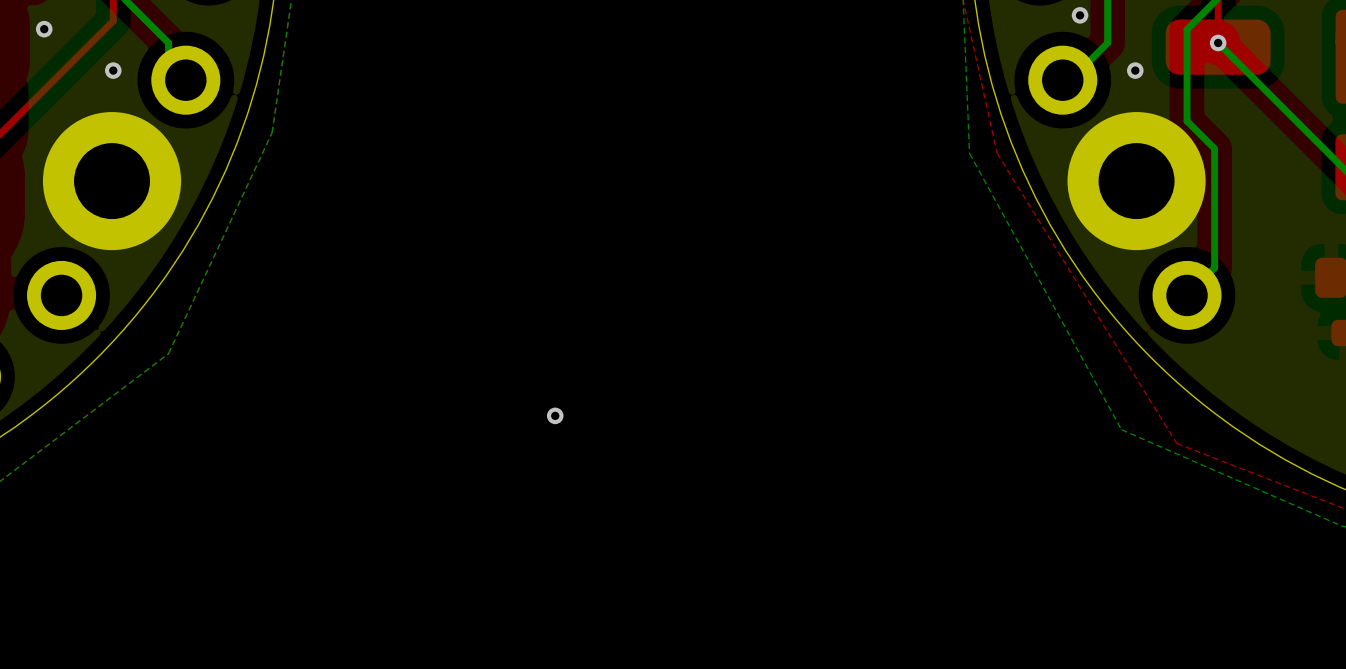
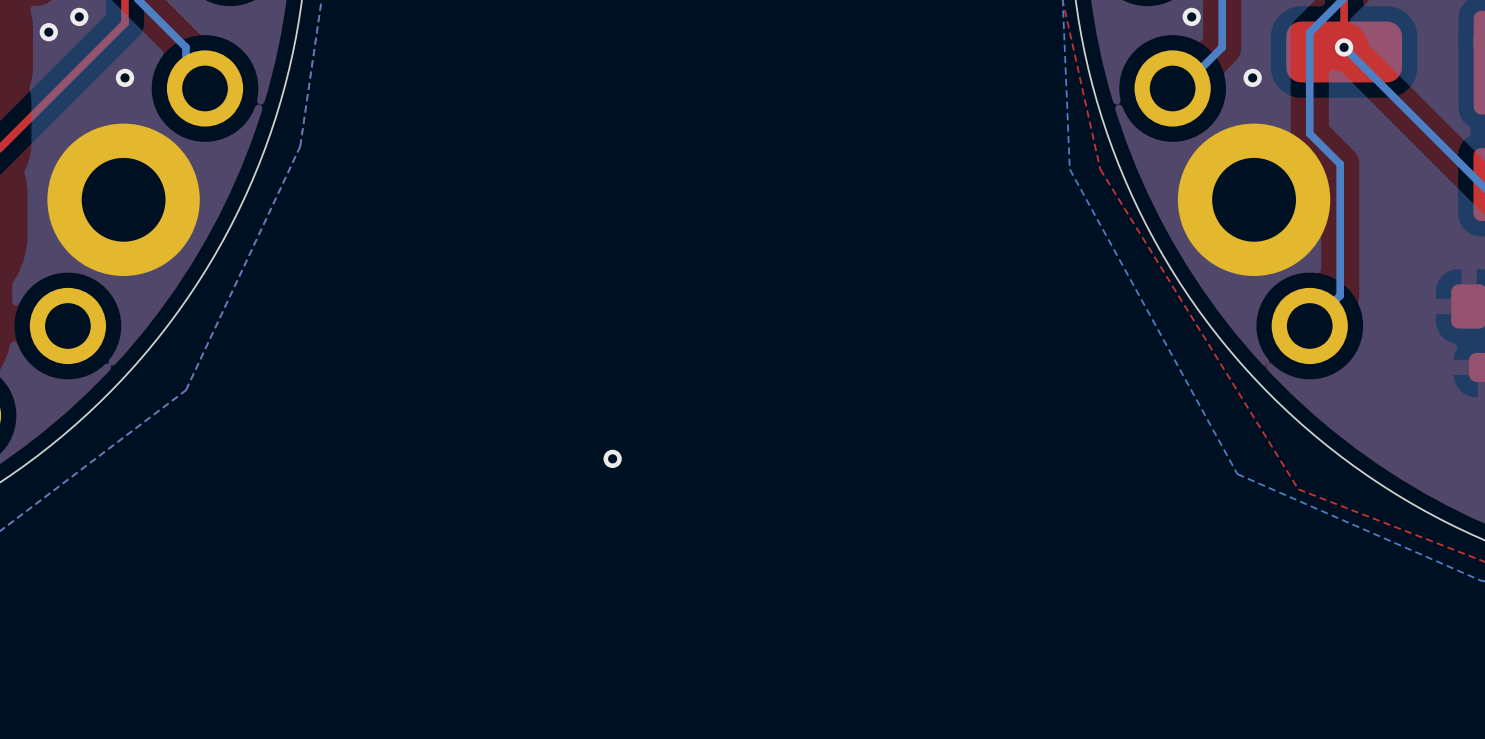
via: none -> (79, 16)

